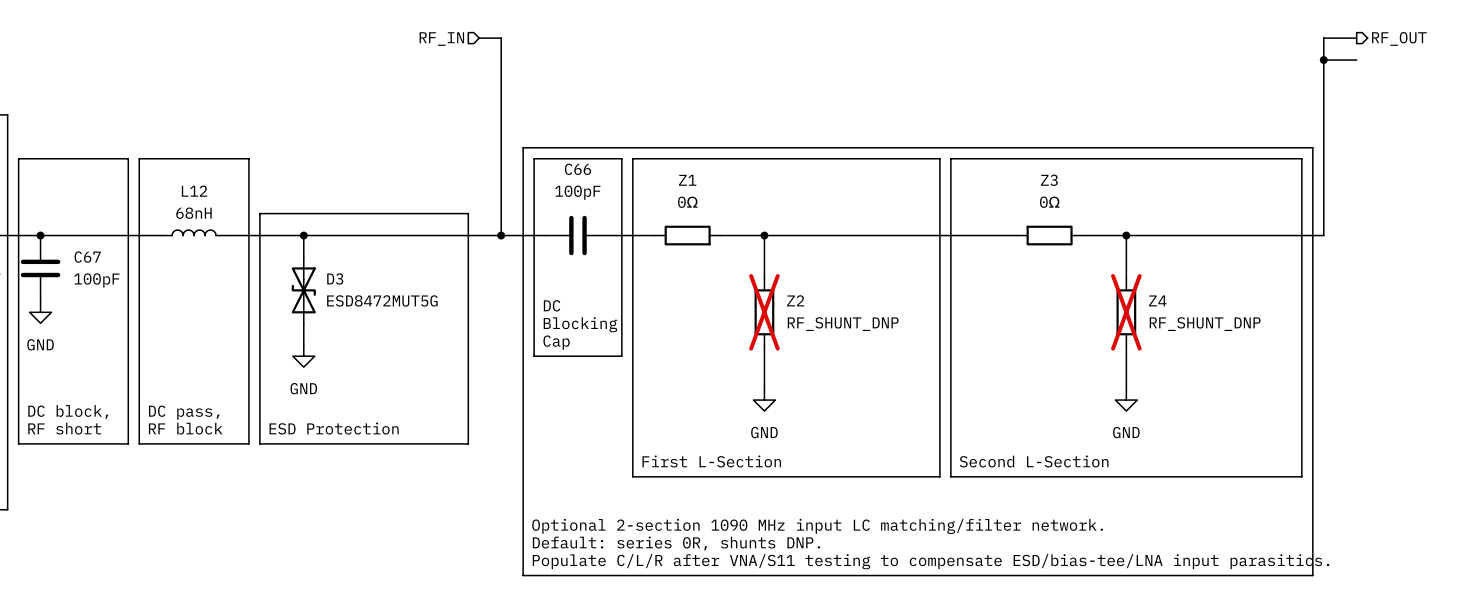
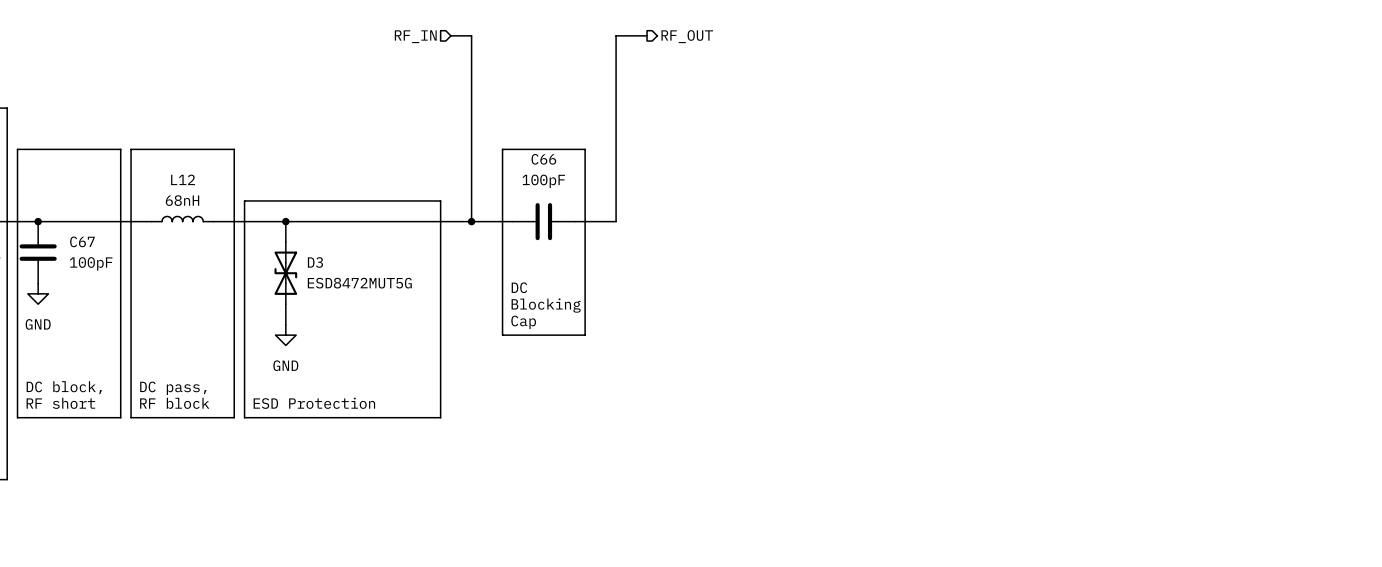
wire: none -> (647, 35) (616, 35) (616, 221)
hierarchical label: none -> RF_OUT (687, 36)
wire: (1356, 38) (1323, 38) (1323, 235) (1082, 235) -> none
hierarchical label: RF_OUT (1399, 38) -> none
wire: (1323, 60) (1356, 60) -> none
junction: (1323, 60) -> none
line: (523, 147) (1312, 147) (1312, 575) (523, 575) (523, 147) -> none
line: (632, 158) (939, 158) (939, 476) (632, 476) (632, 158) -> none
line: (950, 158) (1301, 158) (1301, 476) (950, 476) (950, 158) -> none
Z1: 0Ω (687, 235) -> none
wire: (720, 235) (1016, 235) -> none
wire: (764, 235) (764, 279) -> none
junction: (764, 235) -> none
Z3: 0Ω (1049, 235) -> none
wire: (1126, 235) (1126, 279) -> none
junction: (1126, 235) -> none
Z2: RF_SHUNT_DNP (764, 312) -> none
Z4: RF_SHUNT_DNP (1126, 312) -> none
wire: (764, 345) (764, 389) -> none
wire: (1126, 345) (1126, 389) -> none
power symbol: GND (764, 400) -> none
power symbol: GND (1126, 400) -> none
text: First L-Section (711, 461) -> none
text: Second L-Section (1034, 461) -> none
text: Optional 2-section 1090 MHz input LC matching/filter network. (817, 526) -> none
text: Default: series 0R, shunts DNP. (676, 543) -> none
text: Populate C/L/R after VNA/S11 testing to compensate ESD/bias-tee/LNA input parasitics. (931, 561) -> none

